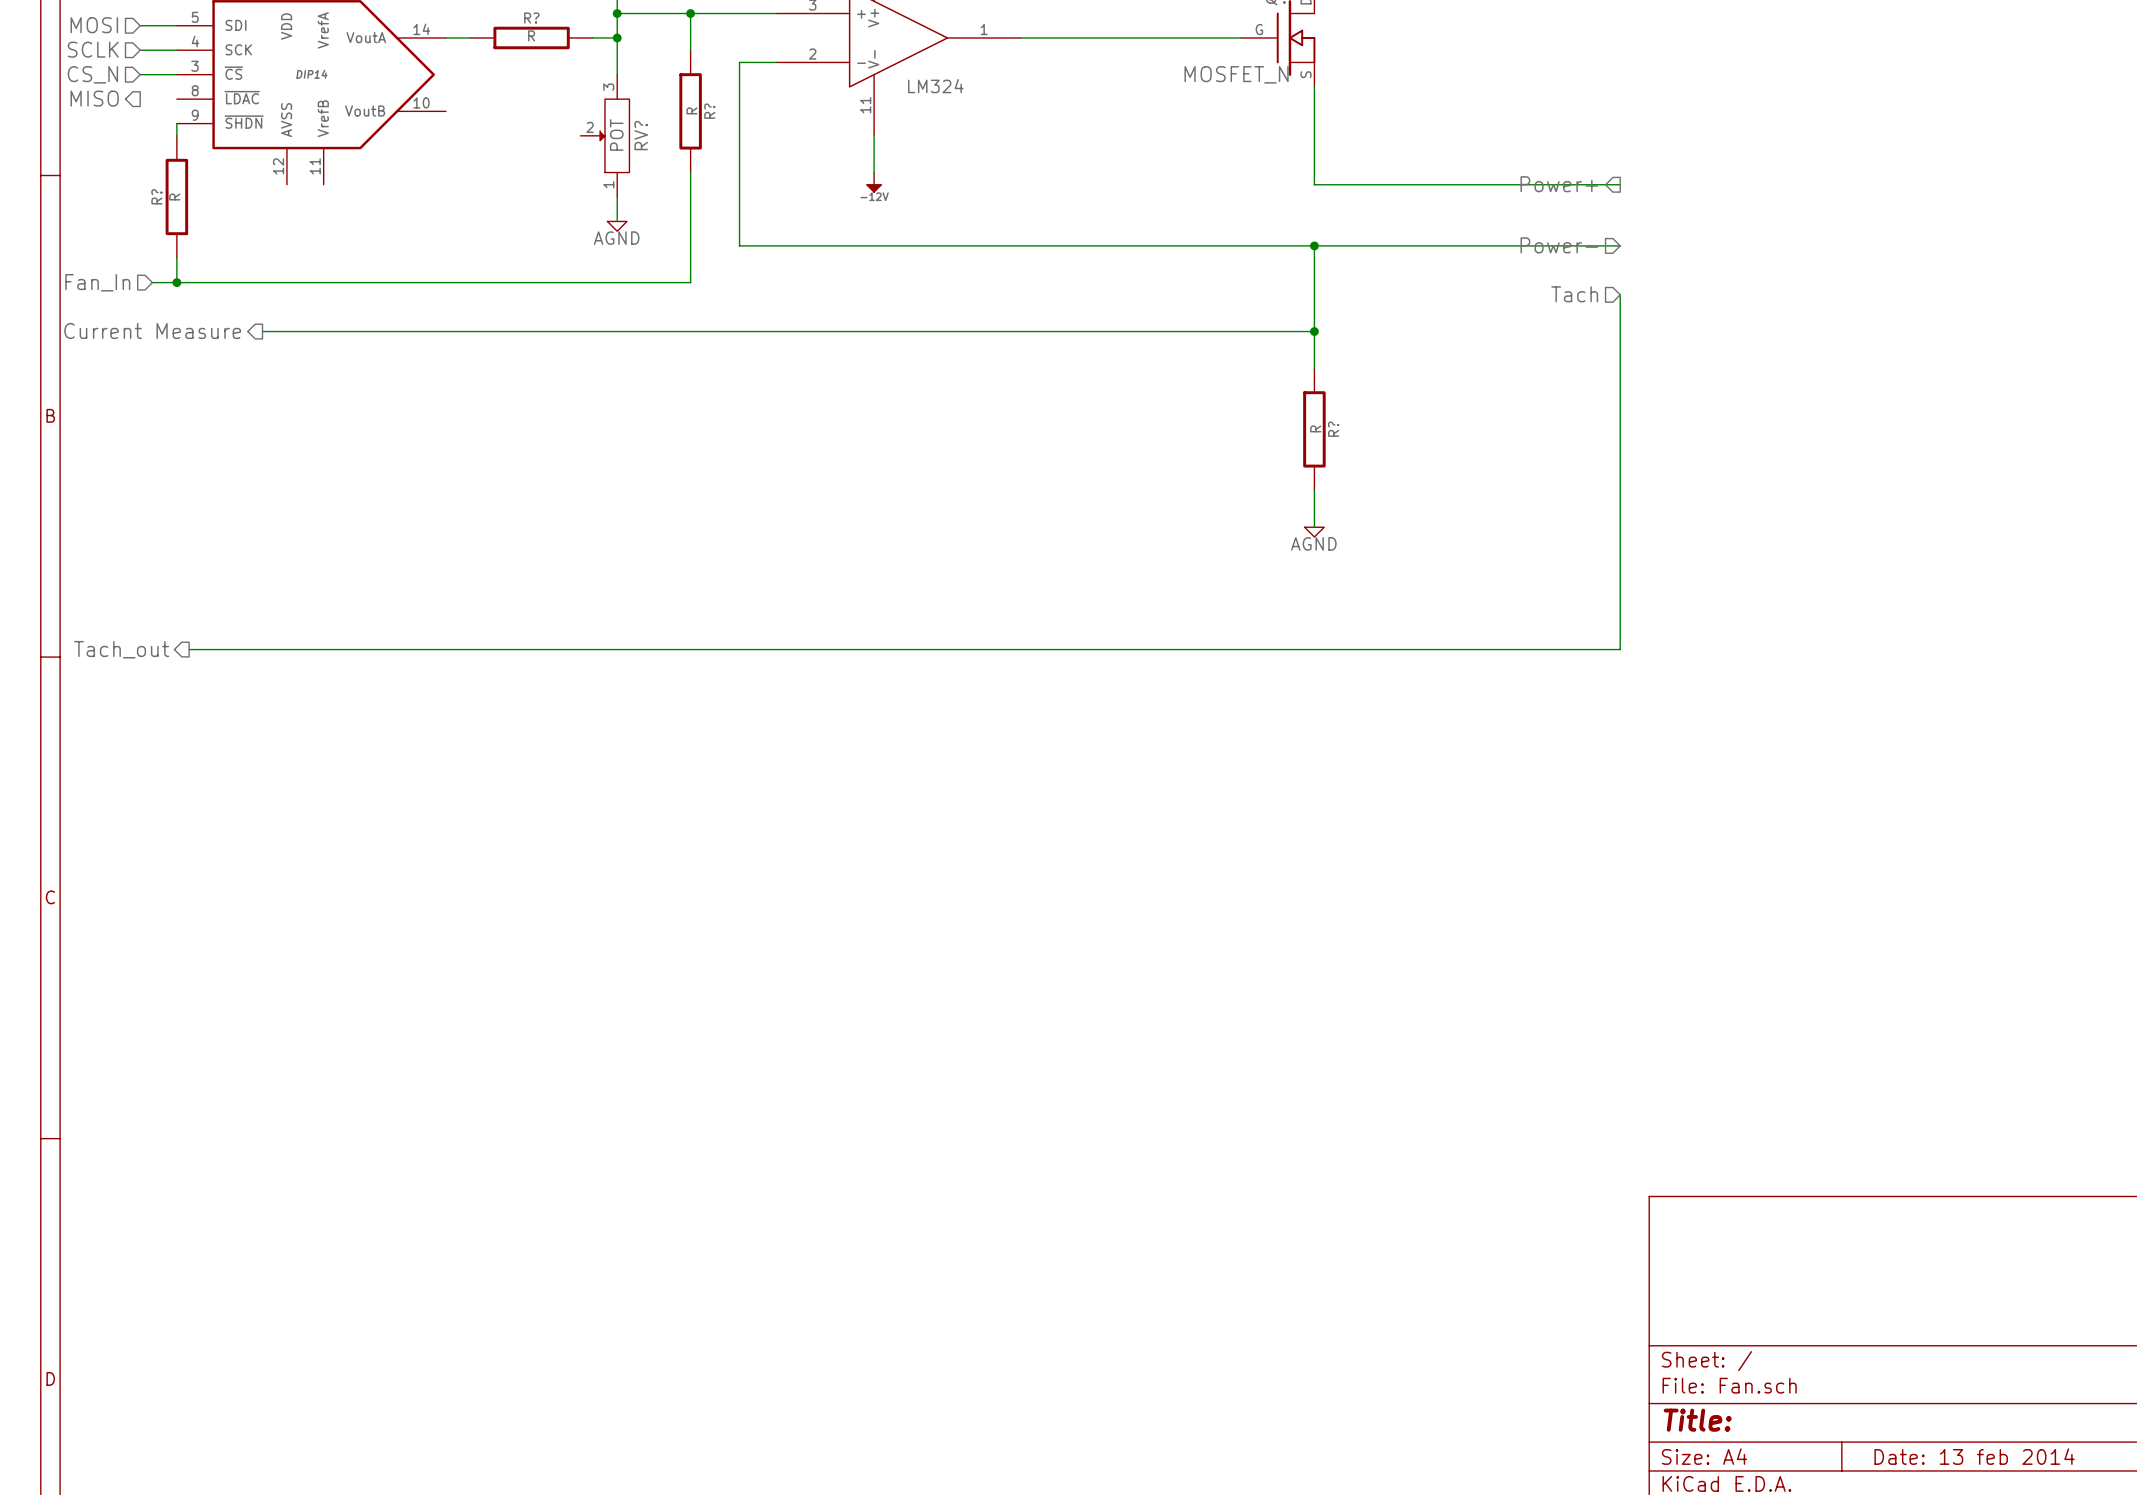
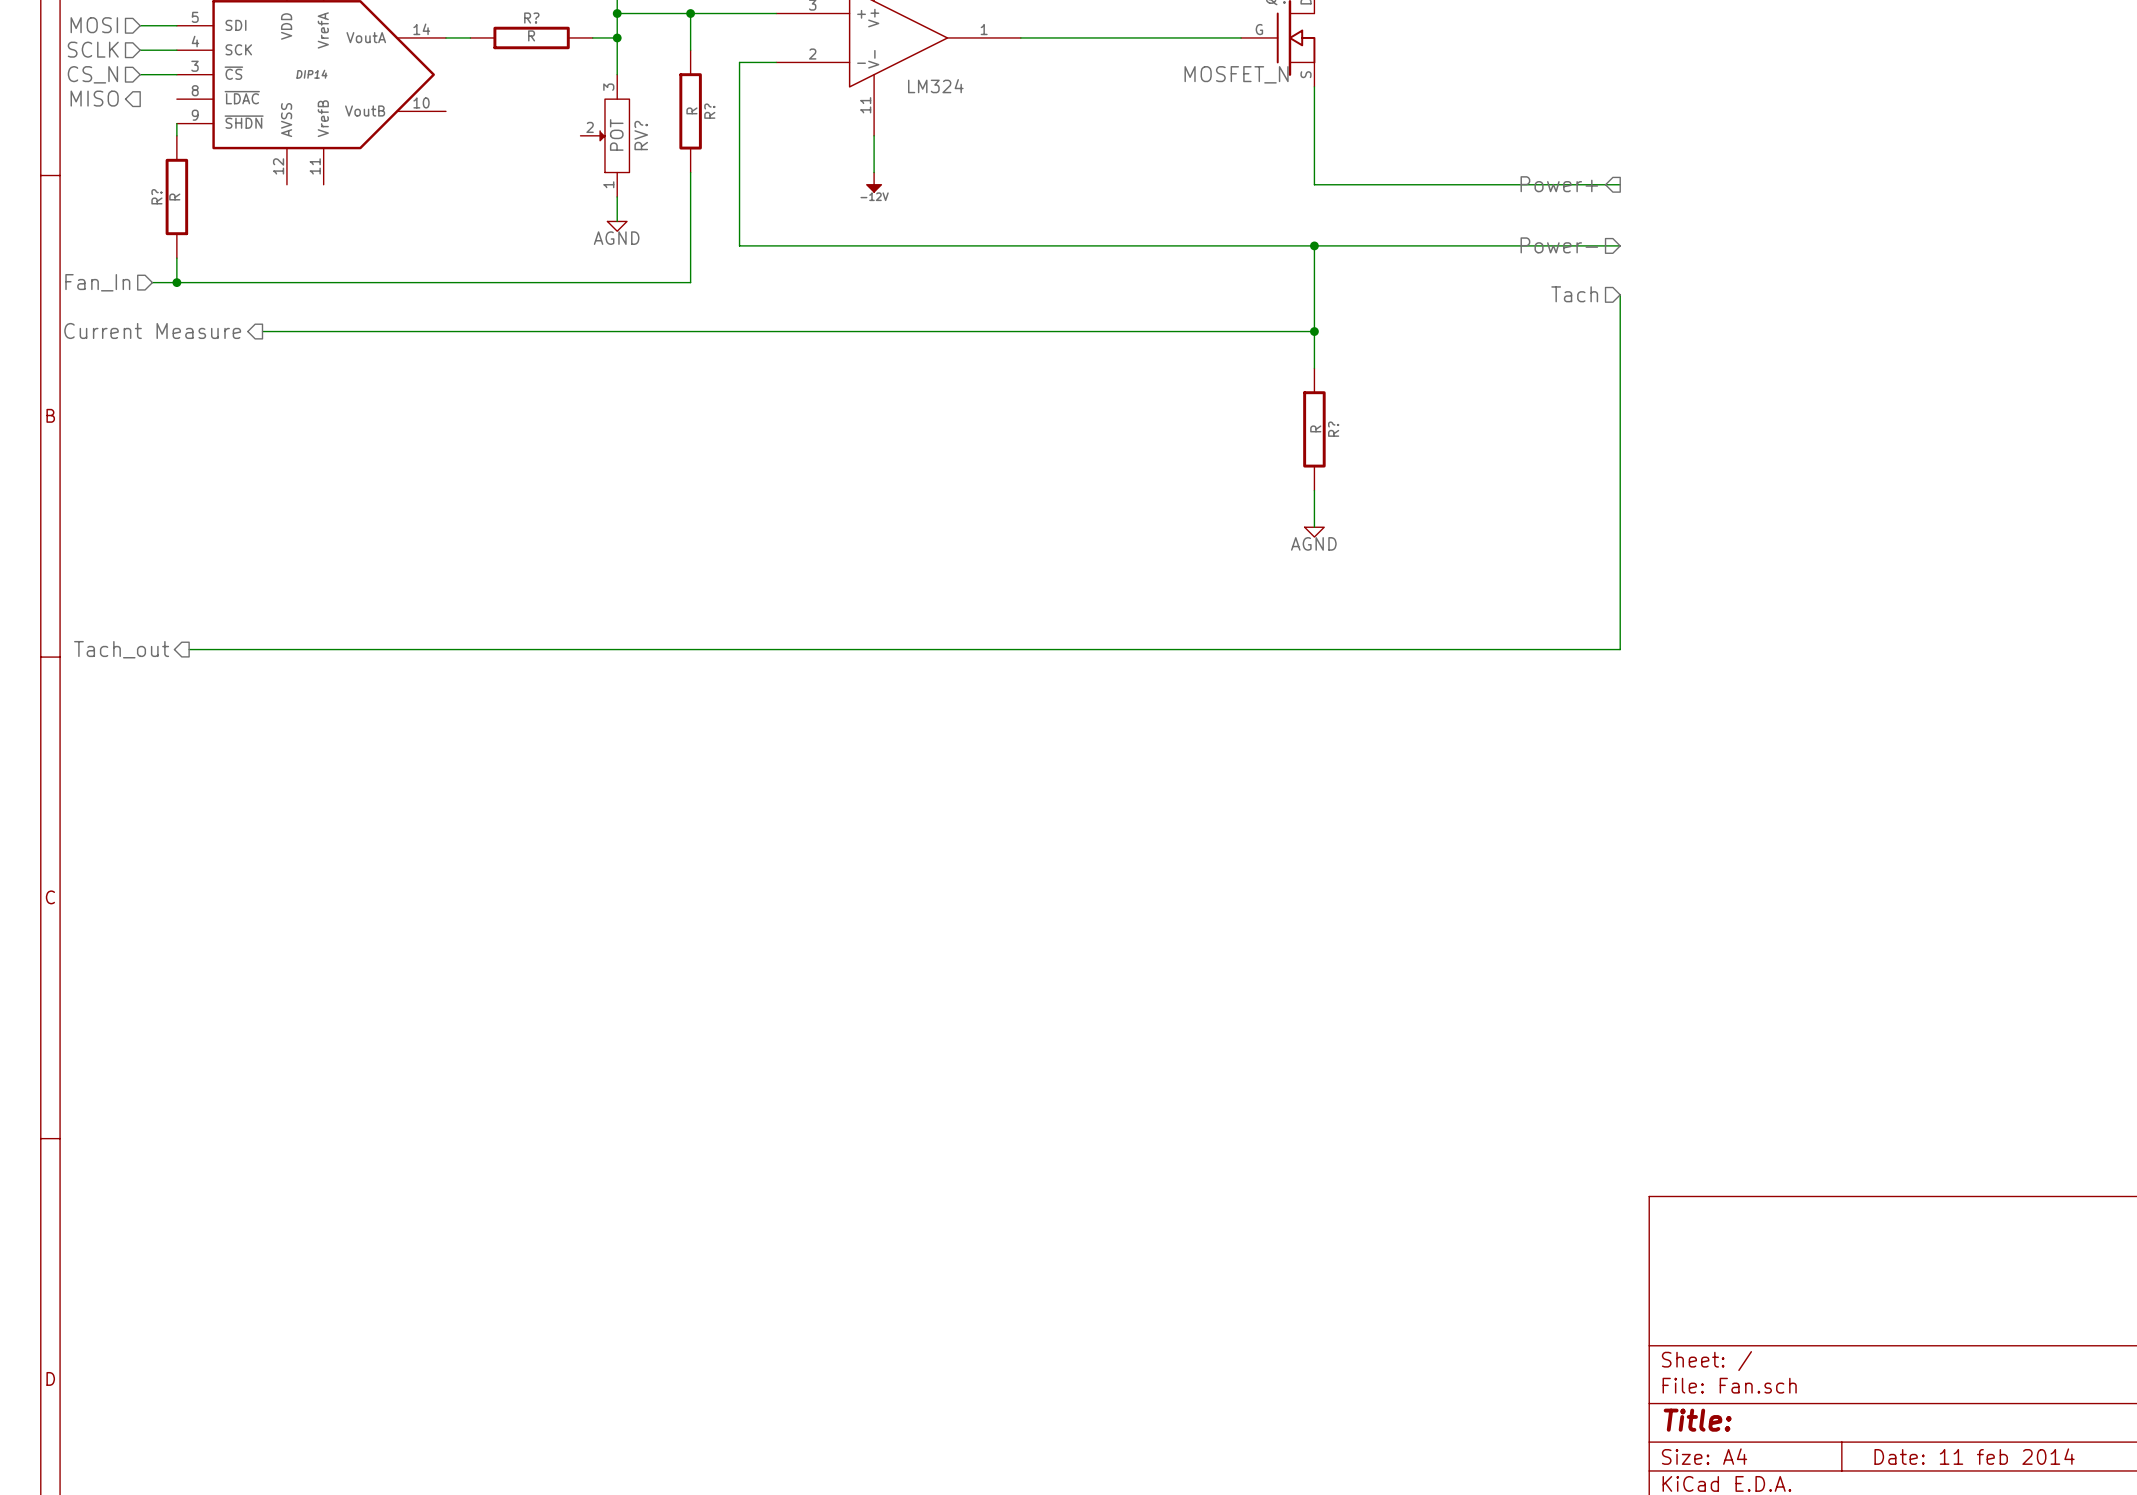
title block: Date: 13 feb 2014 (1974, 1456) -> Date: 11 feb 2014 (1974, 1456)

